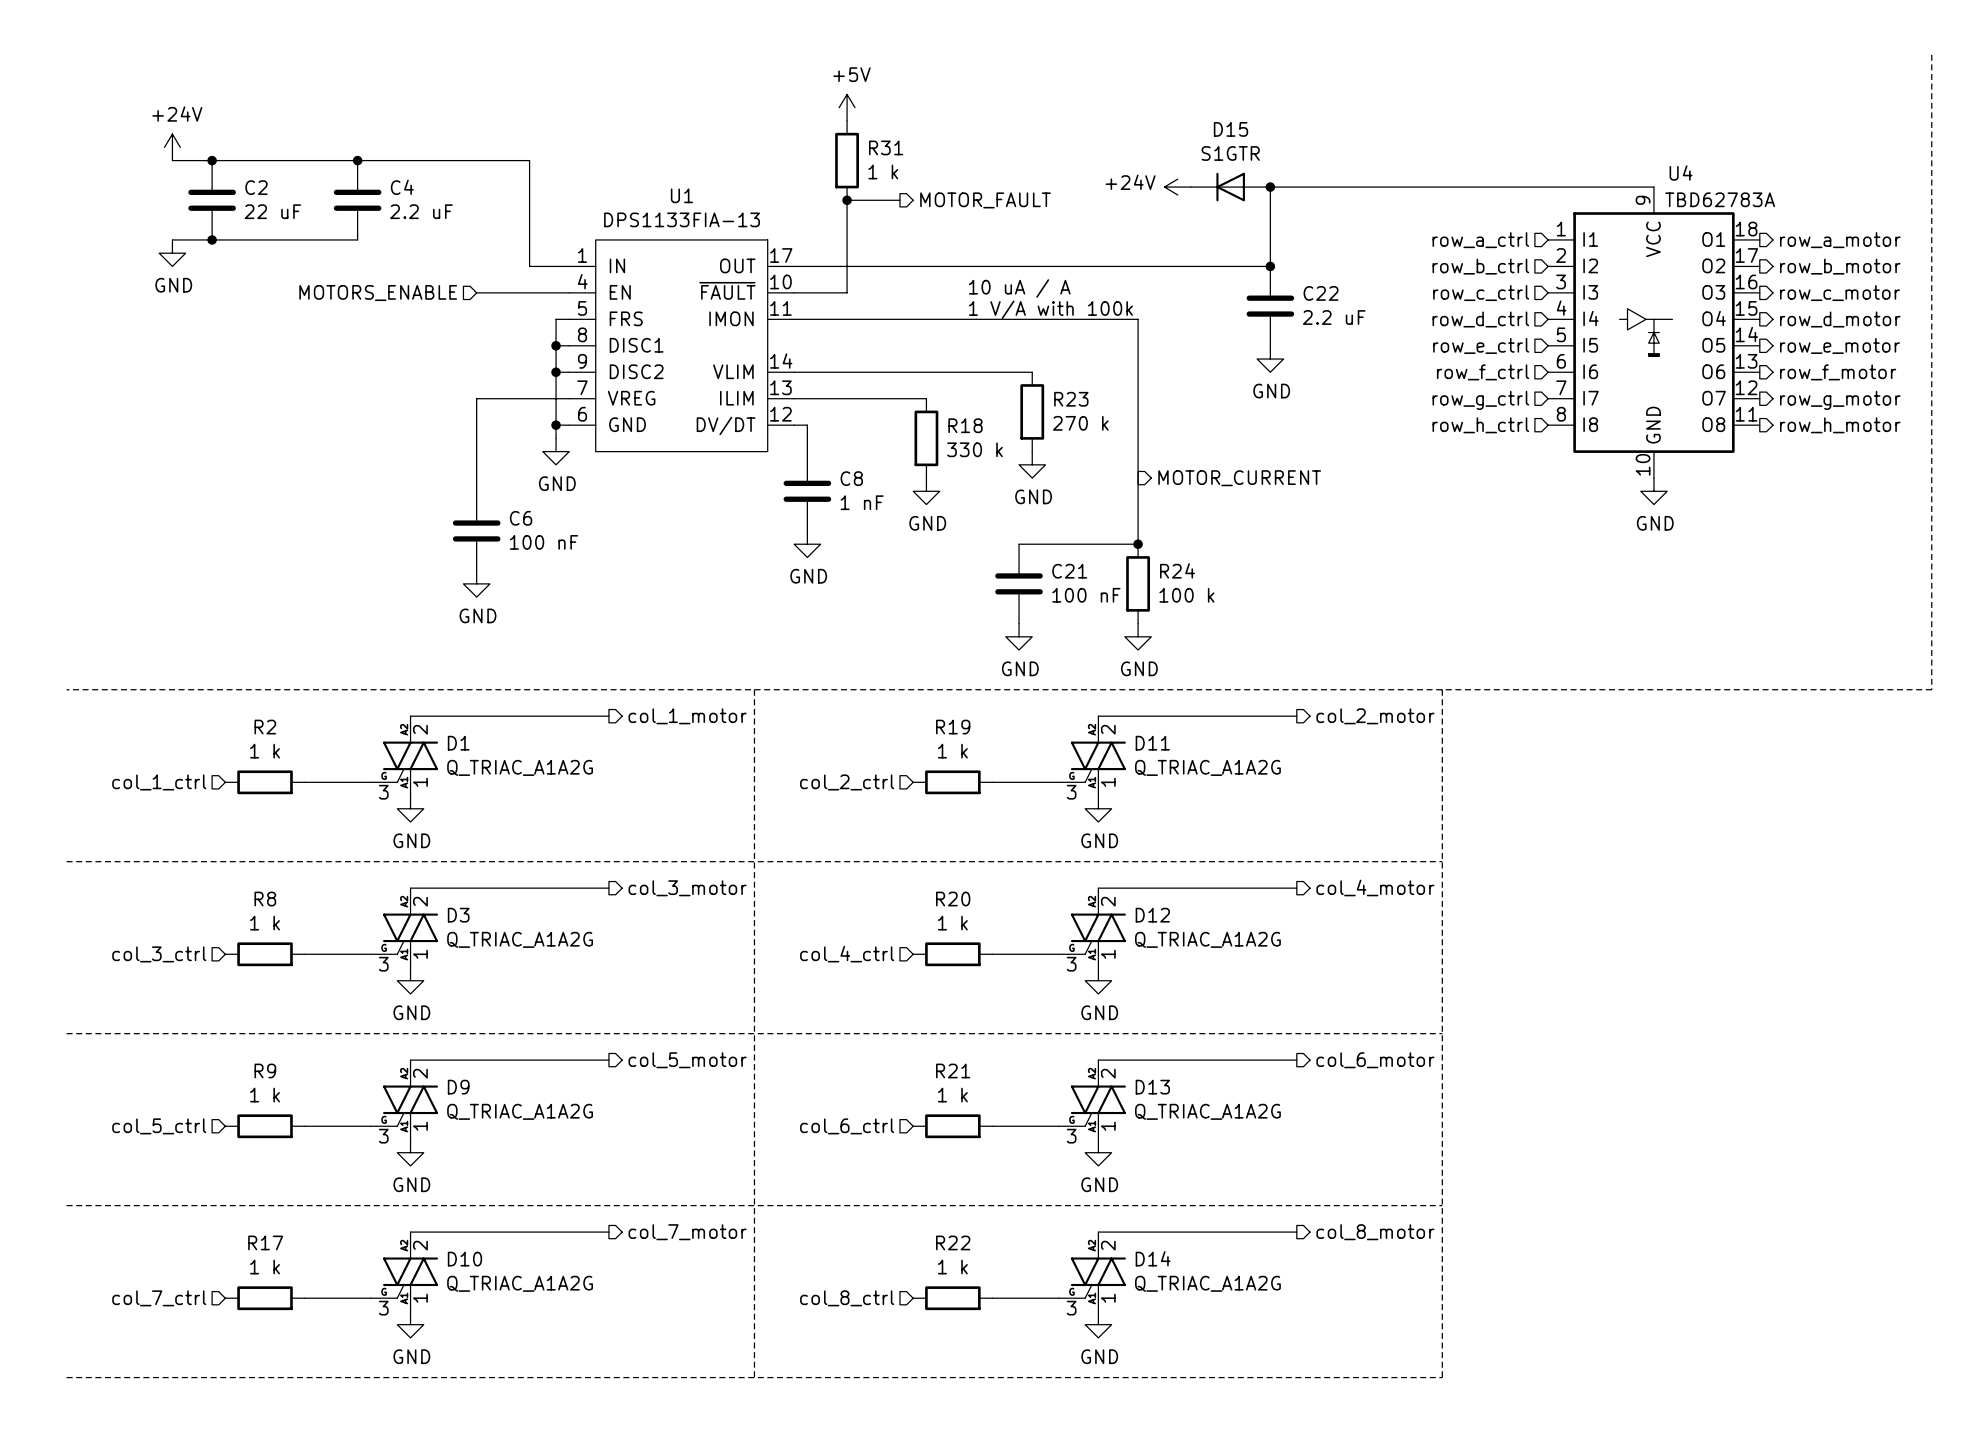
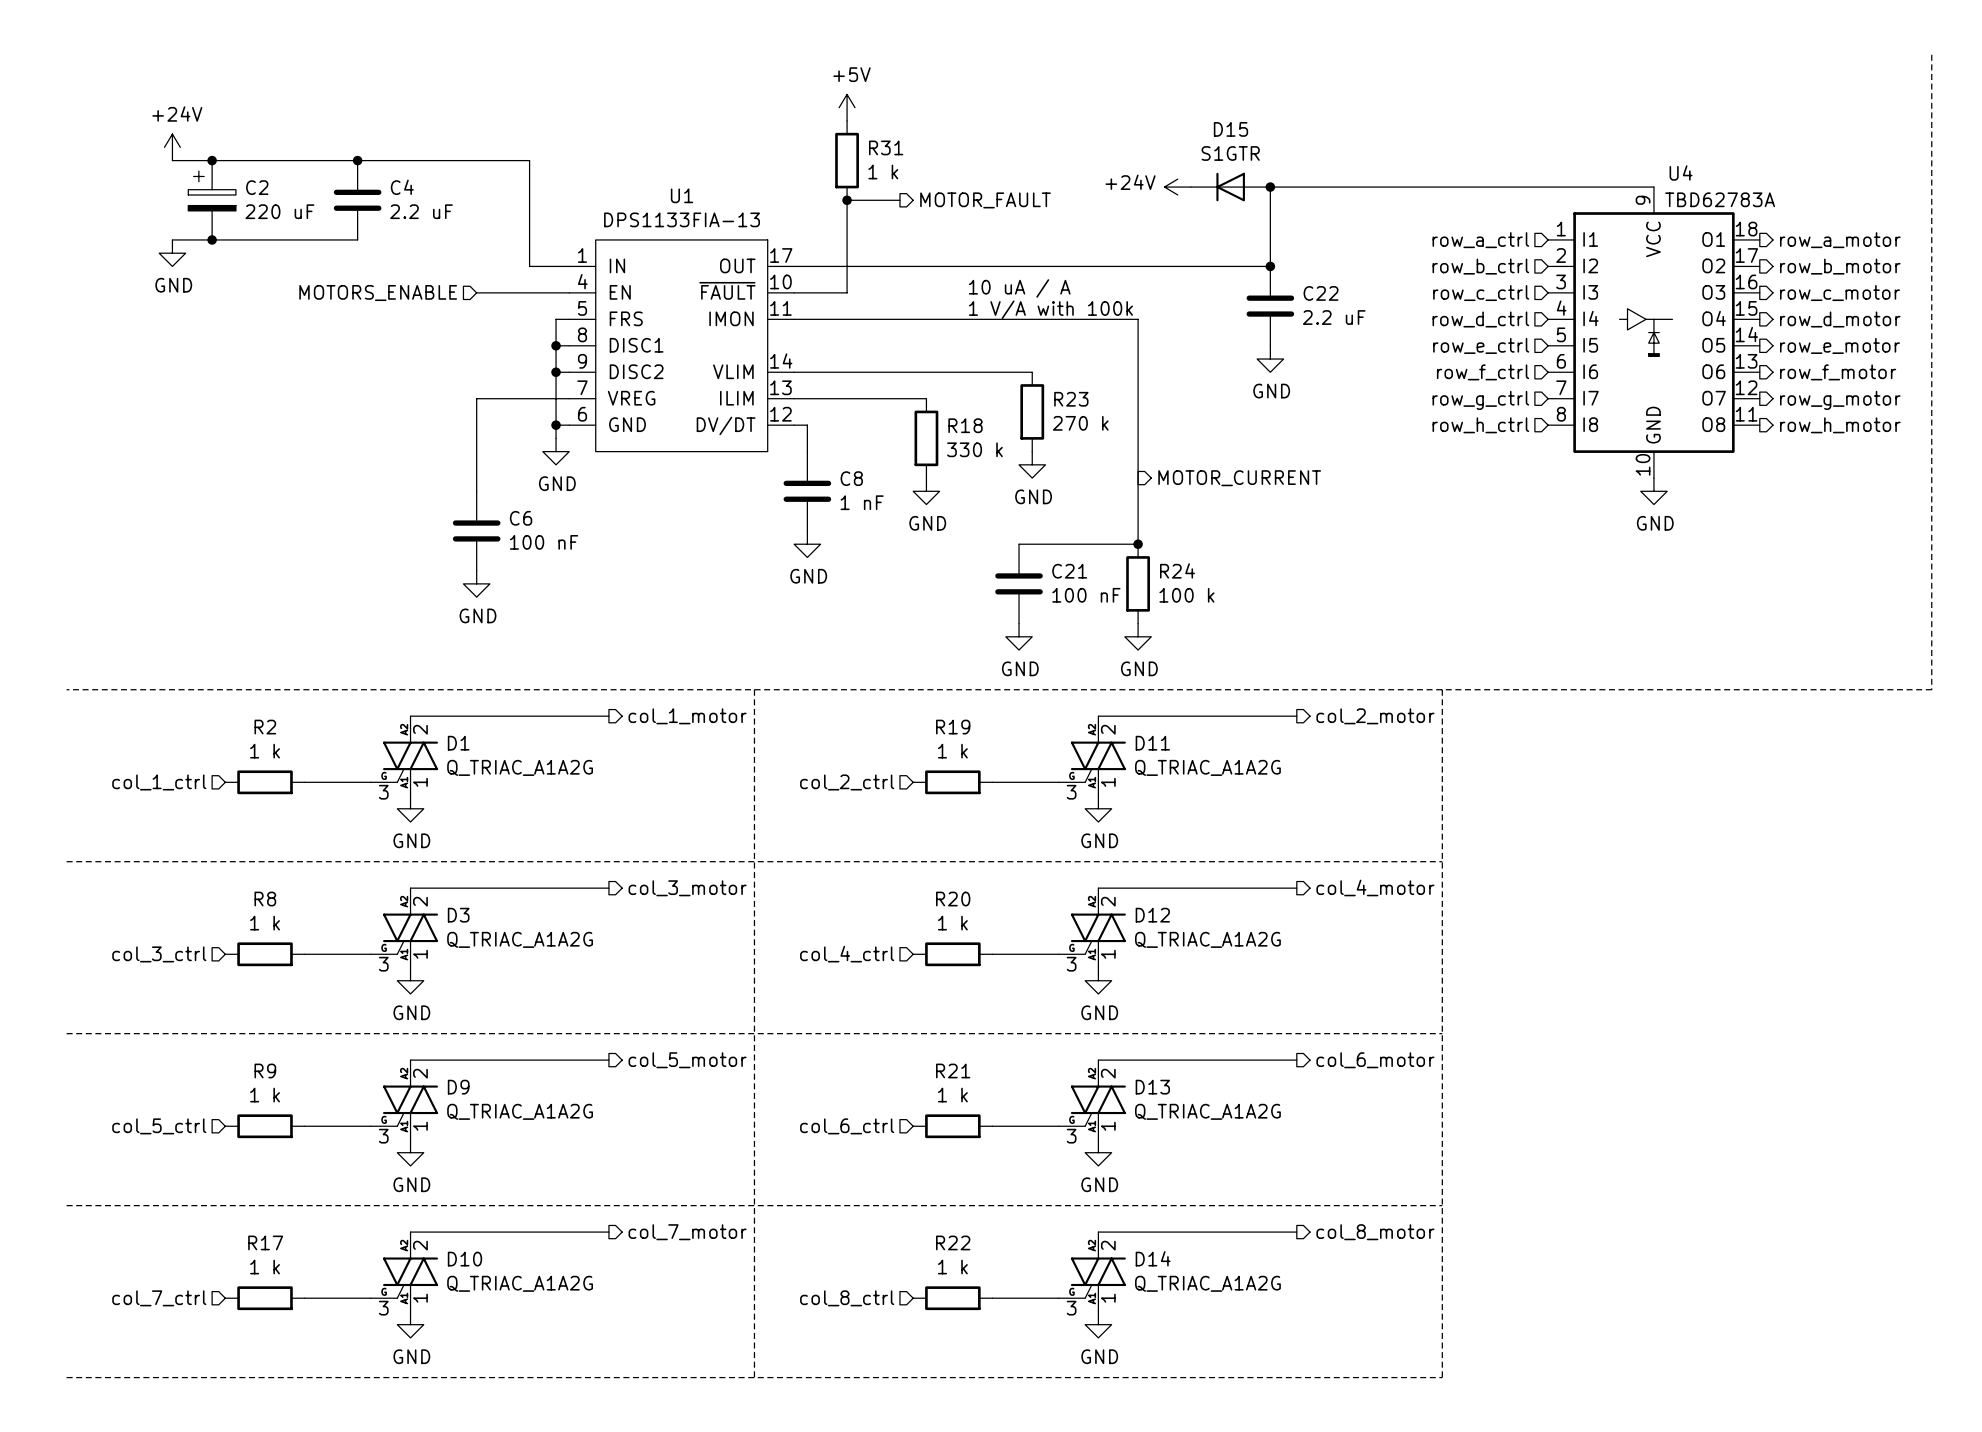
C2 symbol: [188, 160, 236, 240] -> [188, 160, 236, 240]
C2 value: 22 uF (272, 211) -> 220 uF (279, 211)

